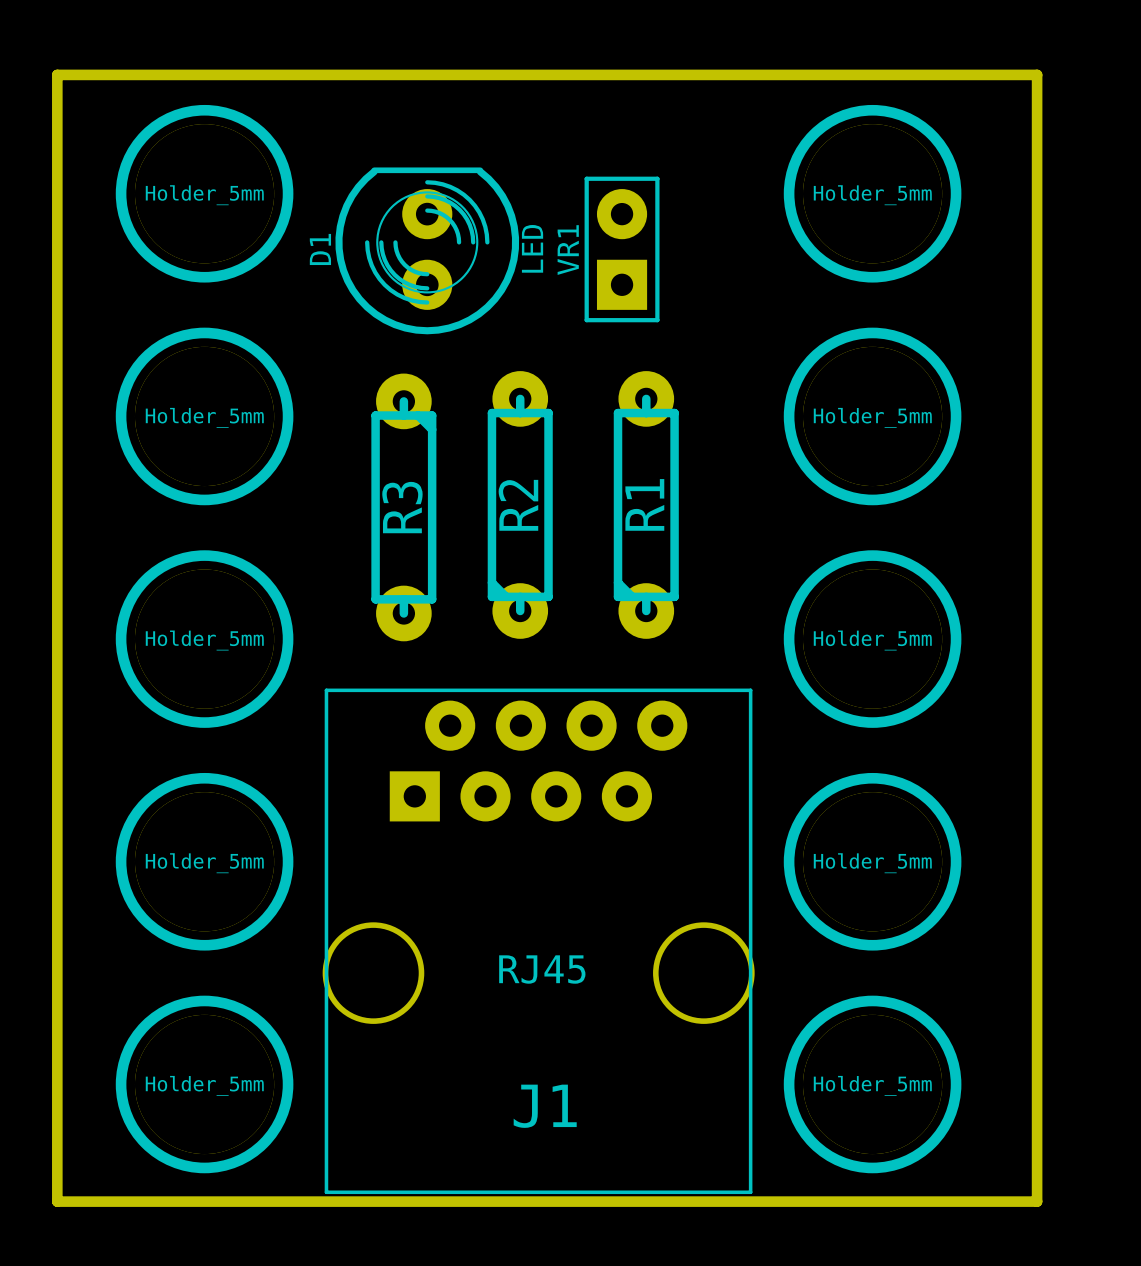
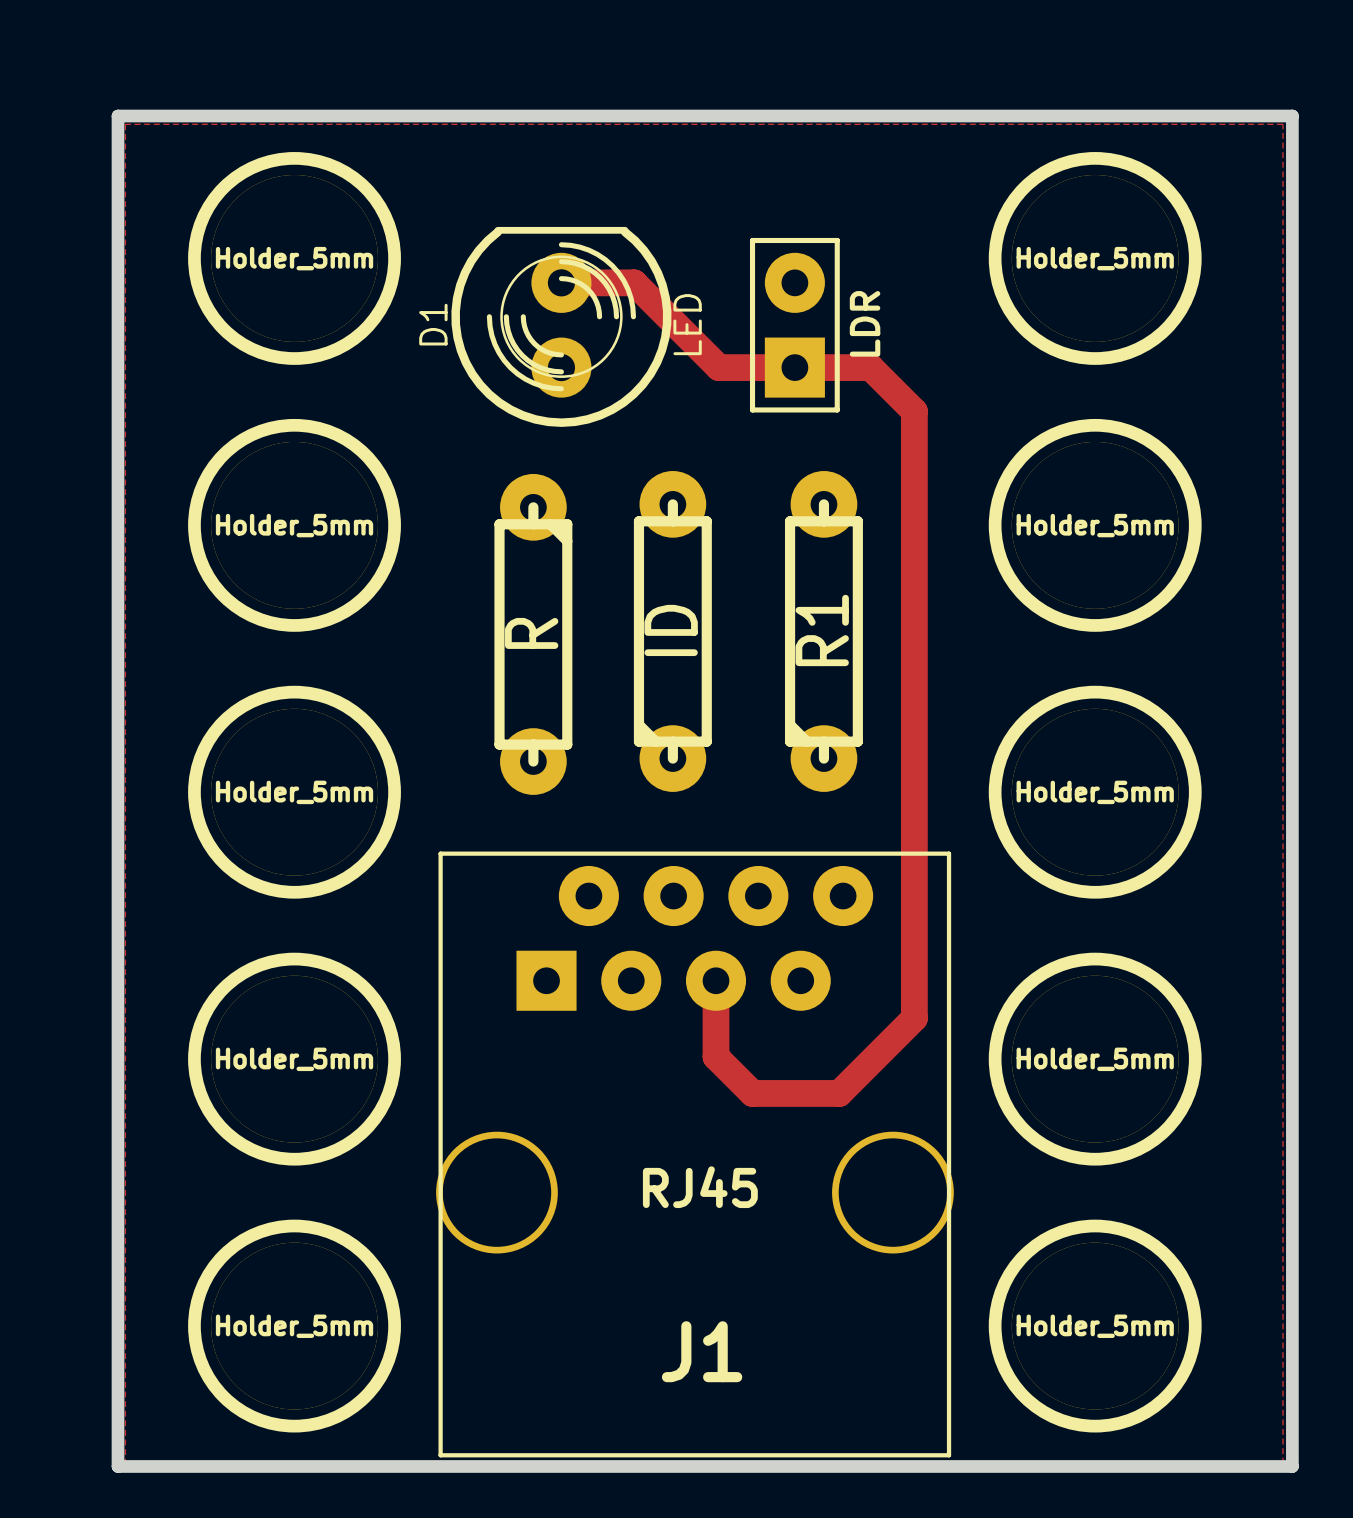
zone outline: none -> (125, 124) (1282, 124) (1282, 1463) (125, 1463) (125, 124)
track: none -> (561, 282) (634, 282) (718, 367) (870, 367) (914, 411) (914, 1018) (839, 1093) (752, 1093) (716, 1056) (716, 980)
VR1 value: none -> LDR (865, 323)
VR1 name: VR1 (568, 250) -> none
R2 value: none -> ID (671, 630)
R3 value: none -> R (531, 633)
R2 name: R2 (518, 505) -> none
R3 name: R3 (402, 507) -> none

